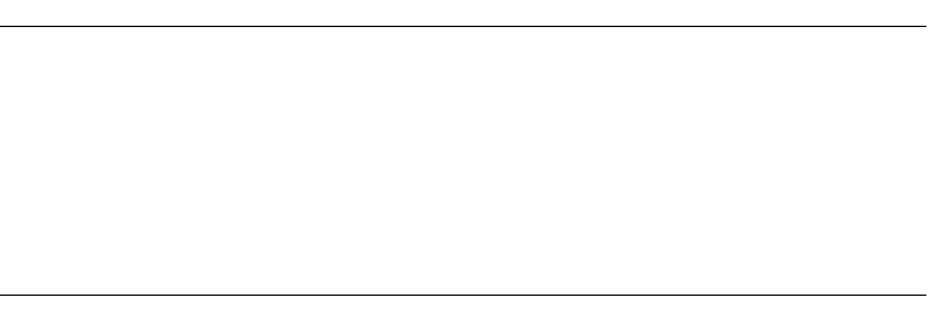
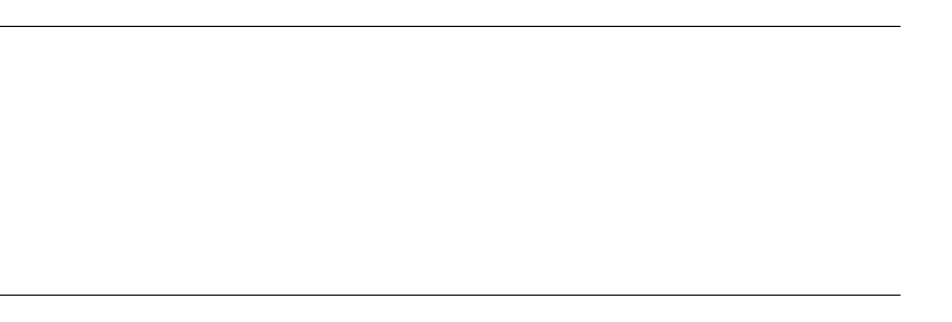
wire: (900, 26) (925, 26) -> none
wire: (900, 295) (925, 295) -> none

